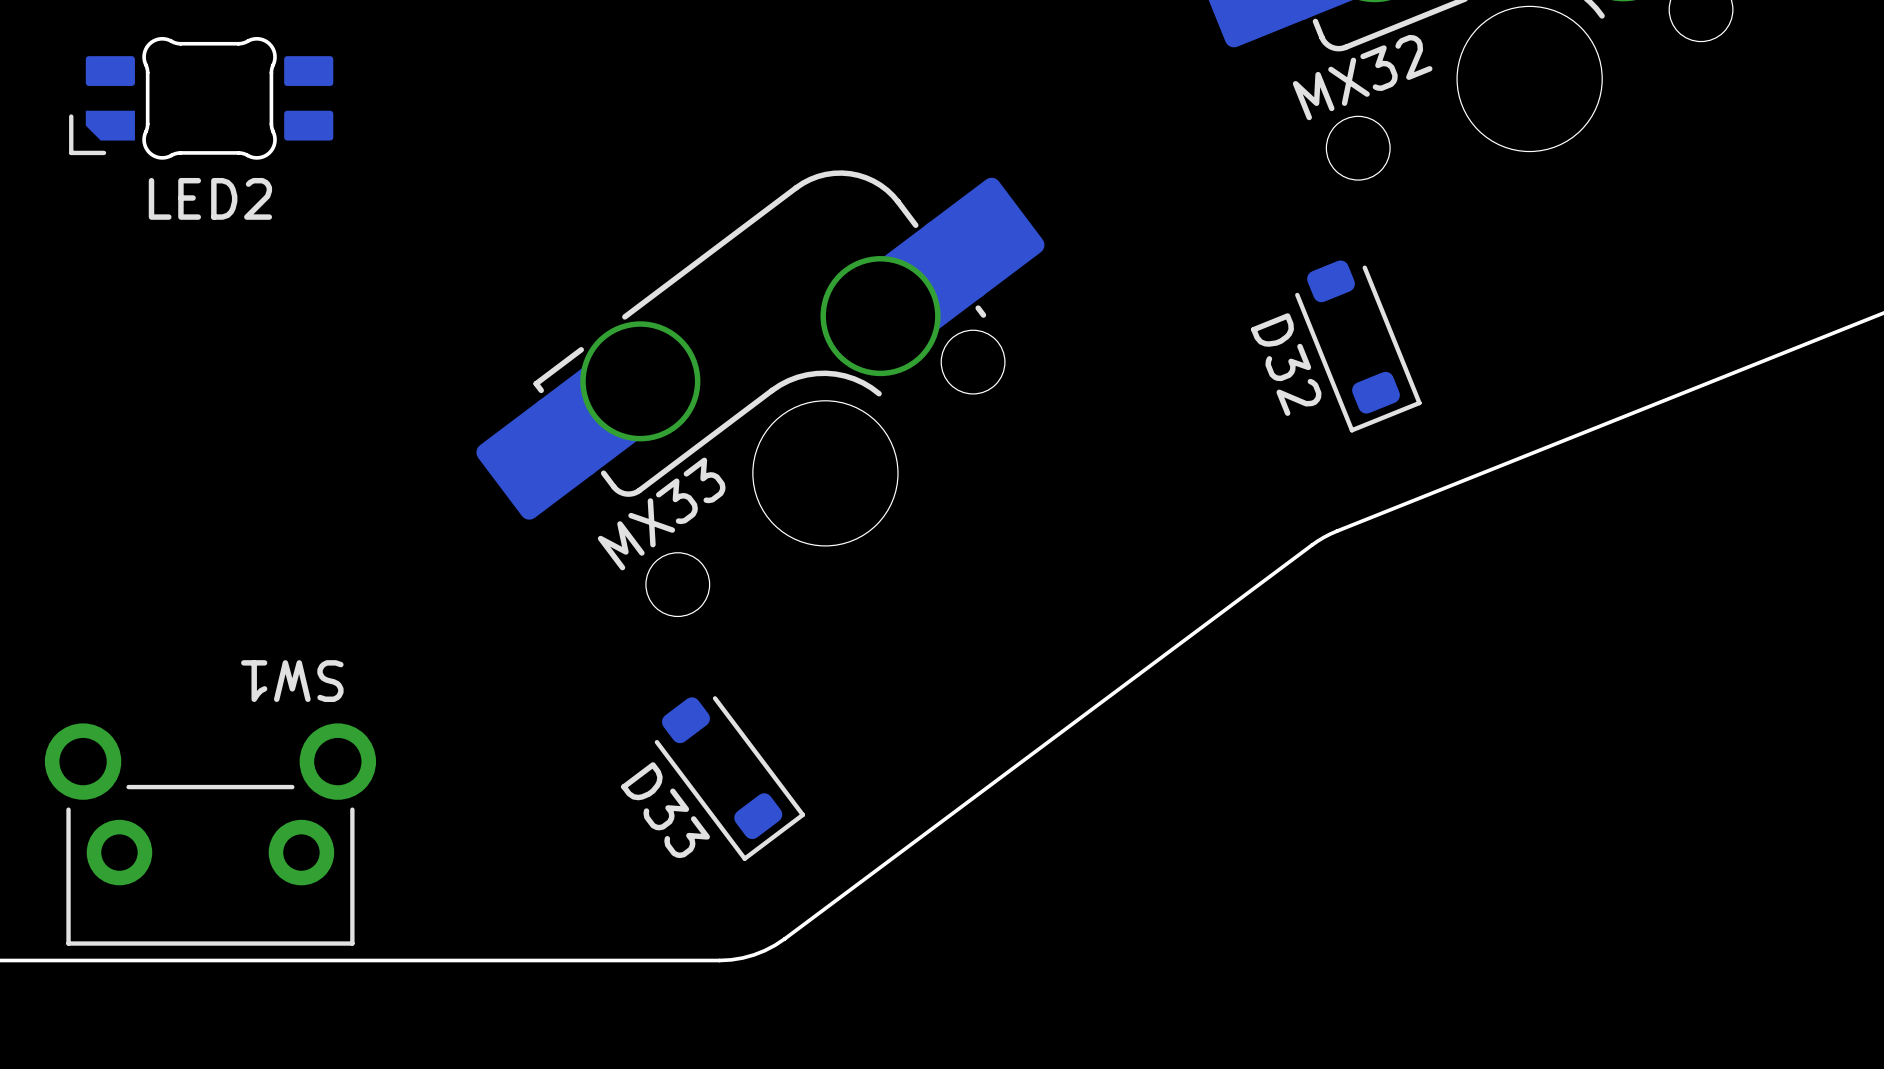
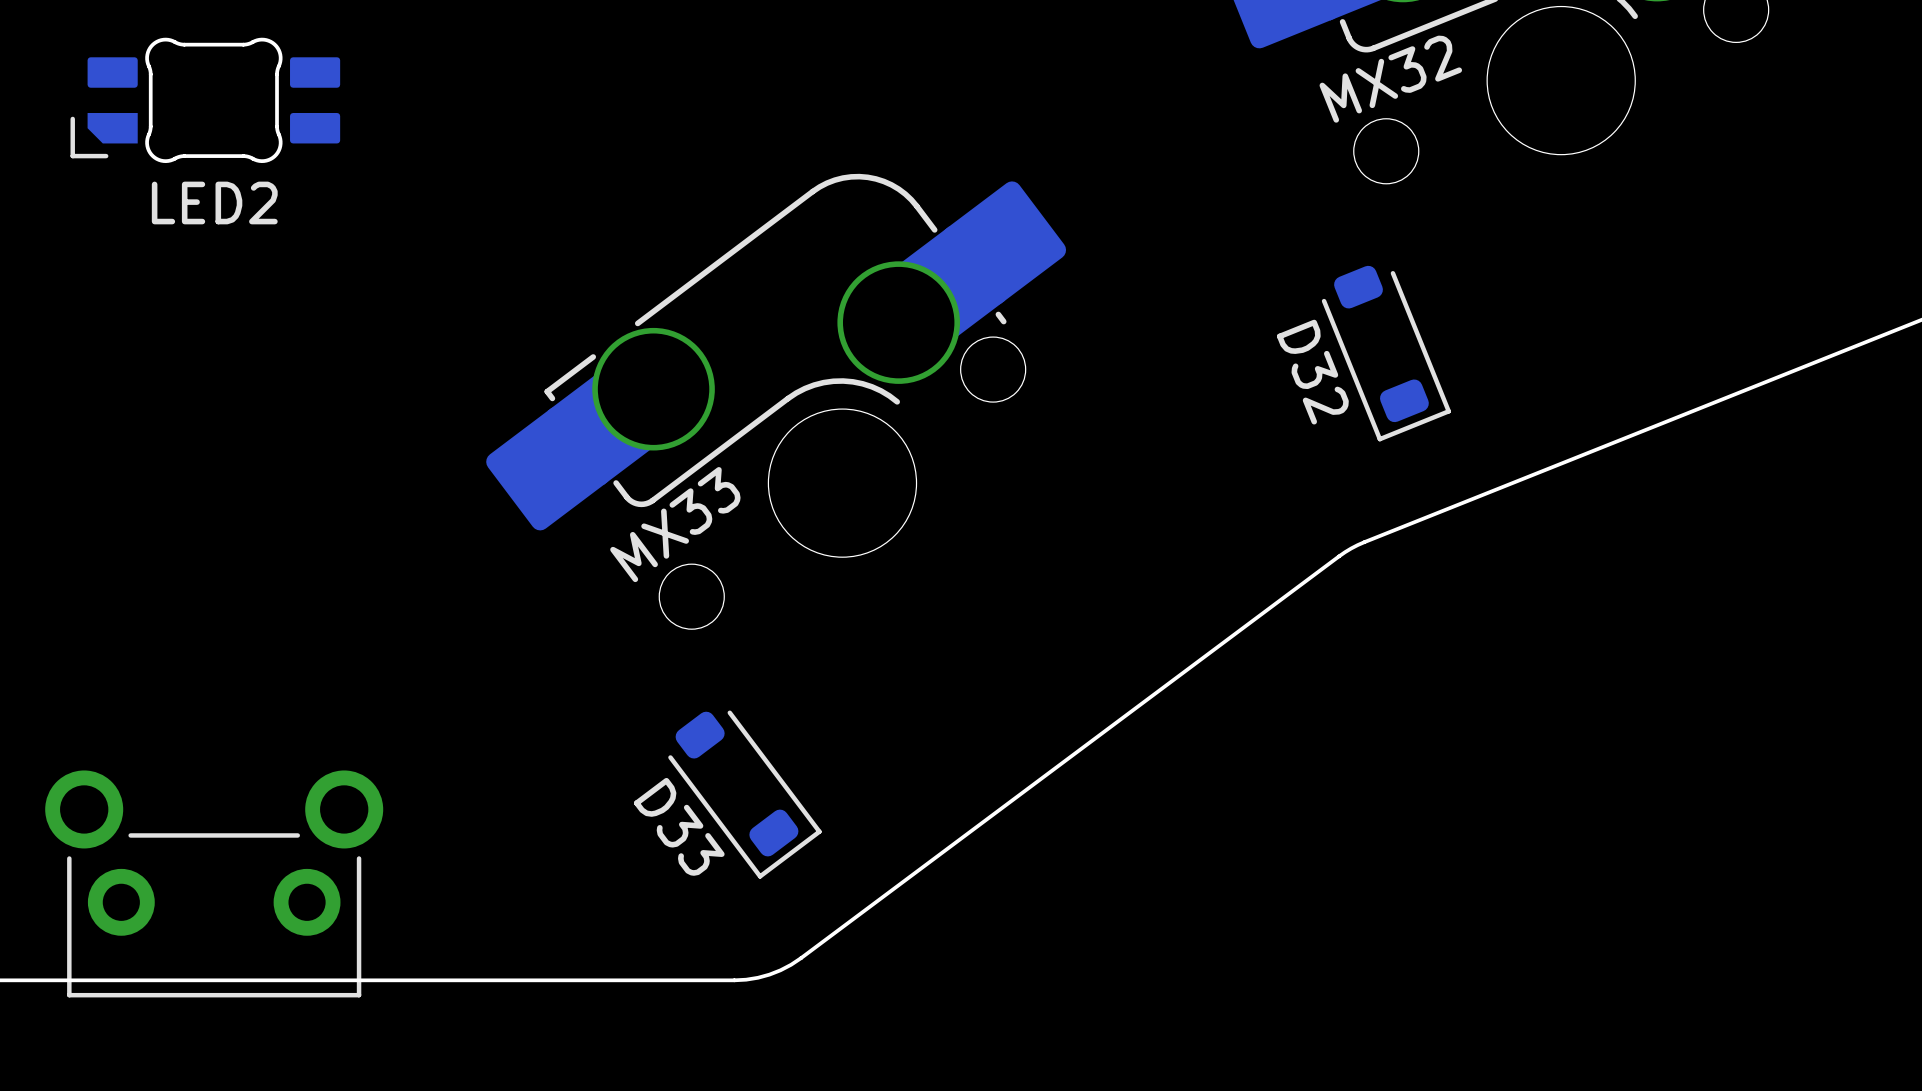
SW1 name: SW1 (292, 681) -> none
SW1 position: (210, 834) -> (214, 883)

